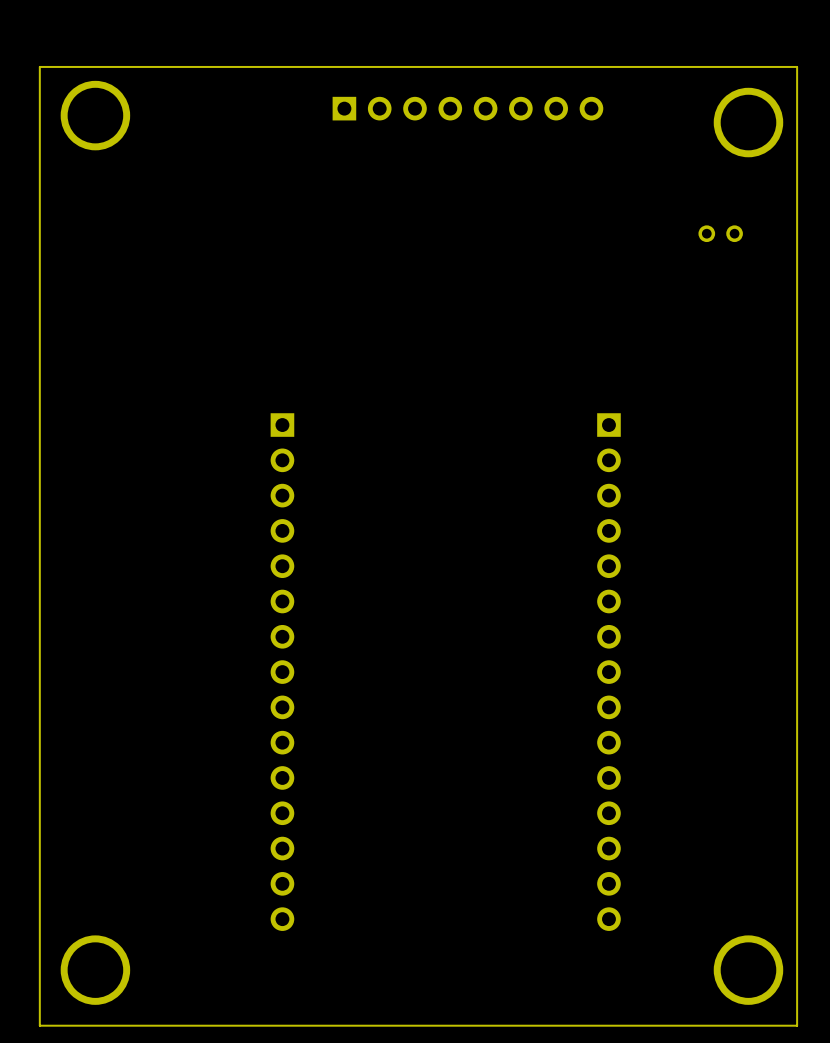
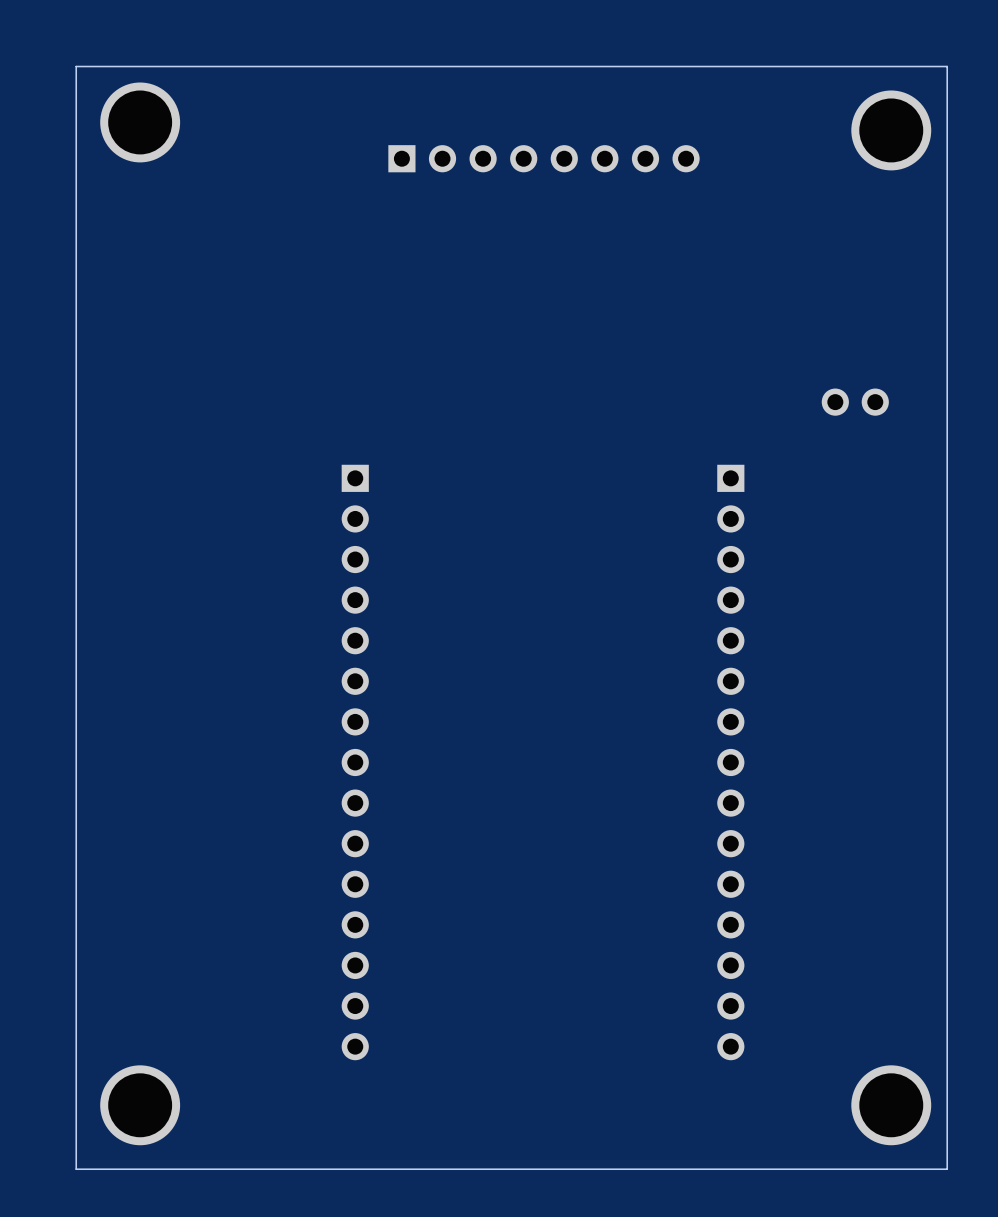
part position: (467, 108) -> (543, 158)
part: (720, 233) -> none
part: none -> (835, 402)
part: none -> (875, 402)

